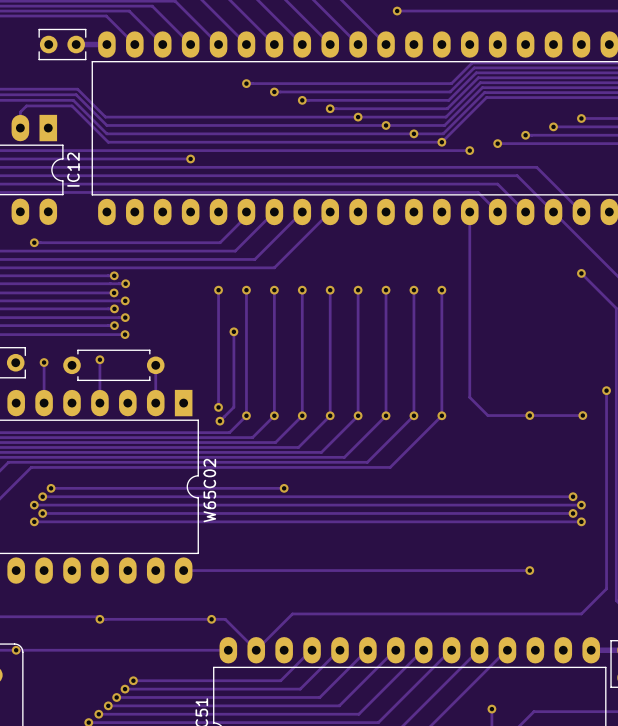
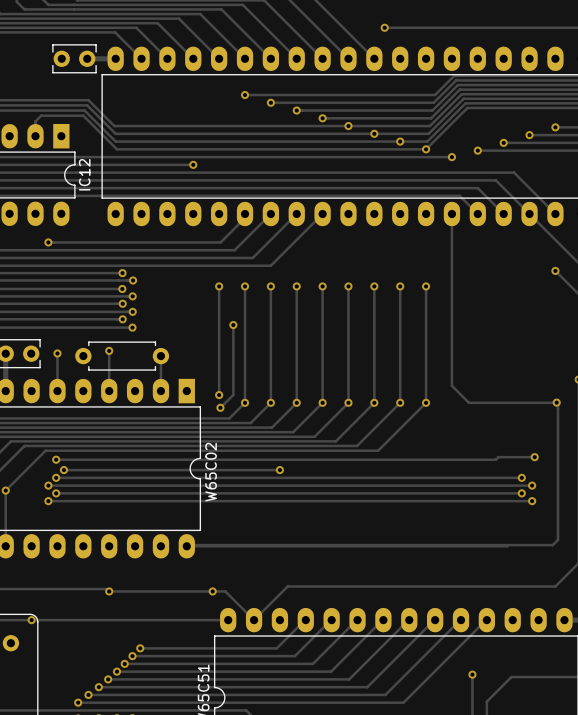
track: (487, 415) (582, 415) -> (468, 402) (558, 402) (558, 539) (552, 545) (185, 545)
via: (529, 415) -> none
track: none -> (534, 457) (498, 457) (495, 459) (56, 459)
via: none -> (534, 457)
via: none -> (56, 459)
track: (545, 496) (573, 496) -> none
via: none -> (521, 477)
via: (573, 496) -> none
track: (556, 505) (581, 505) -> none
via: none -> (532, 485)
via: (581, 505) -> none
track: (545, 513) (573, 513) -> none
via: none -> (521, 493)
via: (573, 513) -> none
track: (556, 521) (581, 521) -> none
via: none -> (532, 501)
via: (581, 521) -> none
via: (529, 570) -> none

